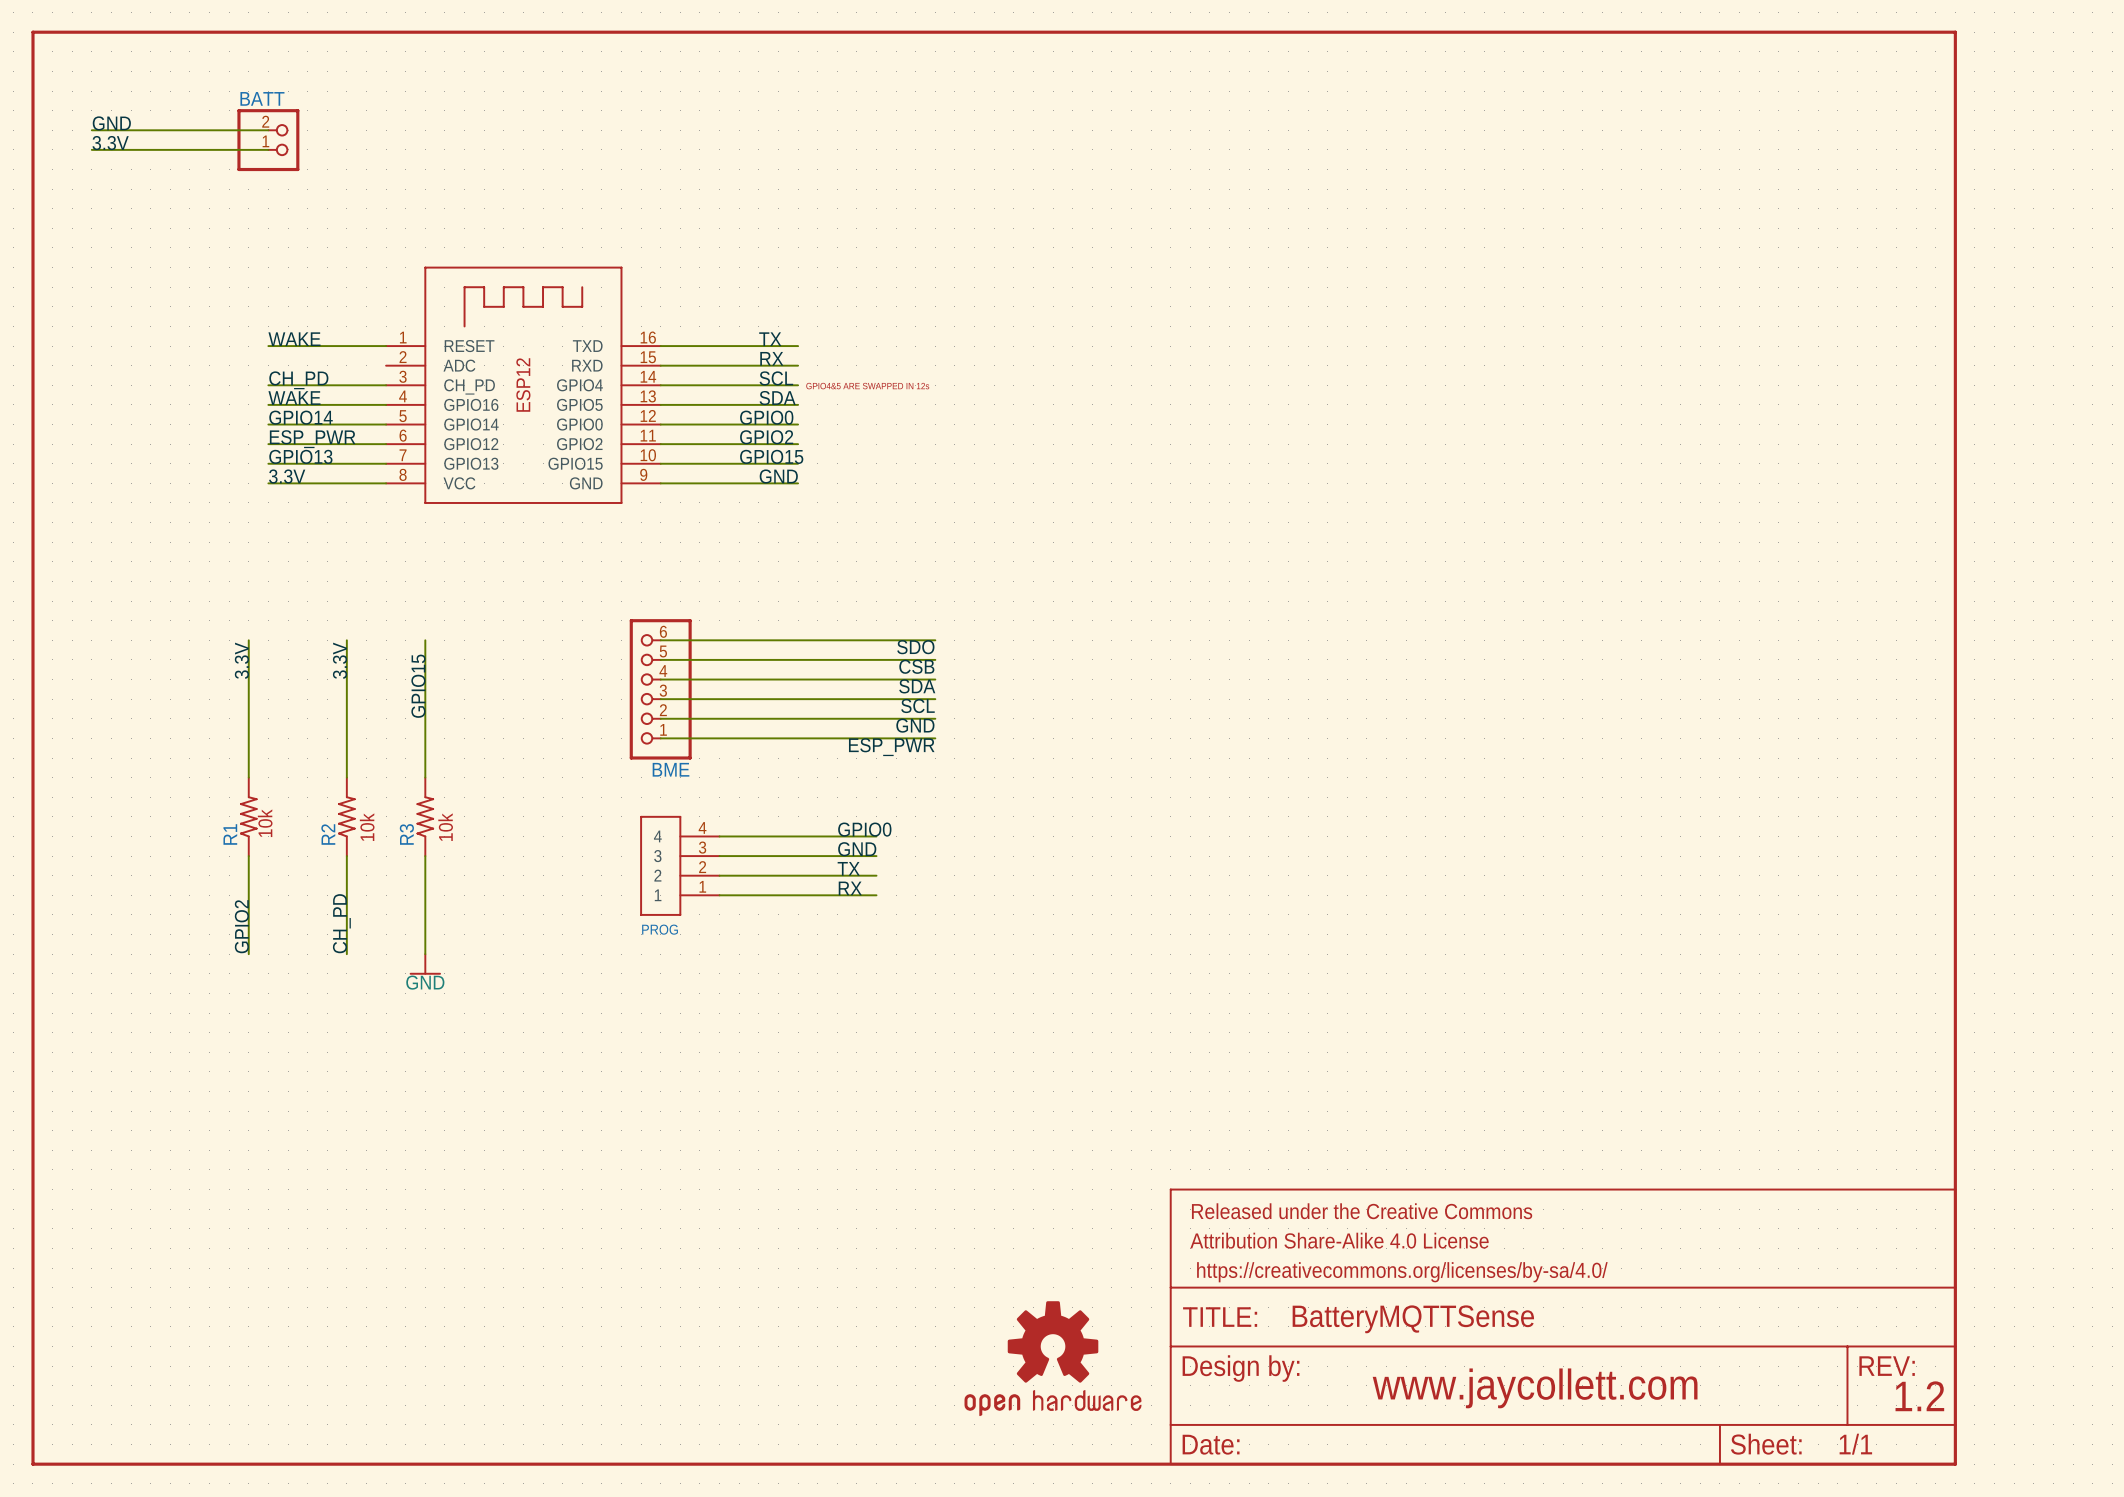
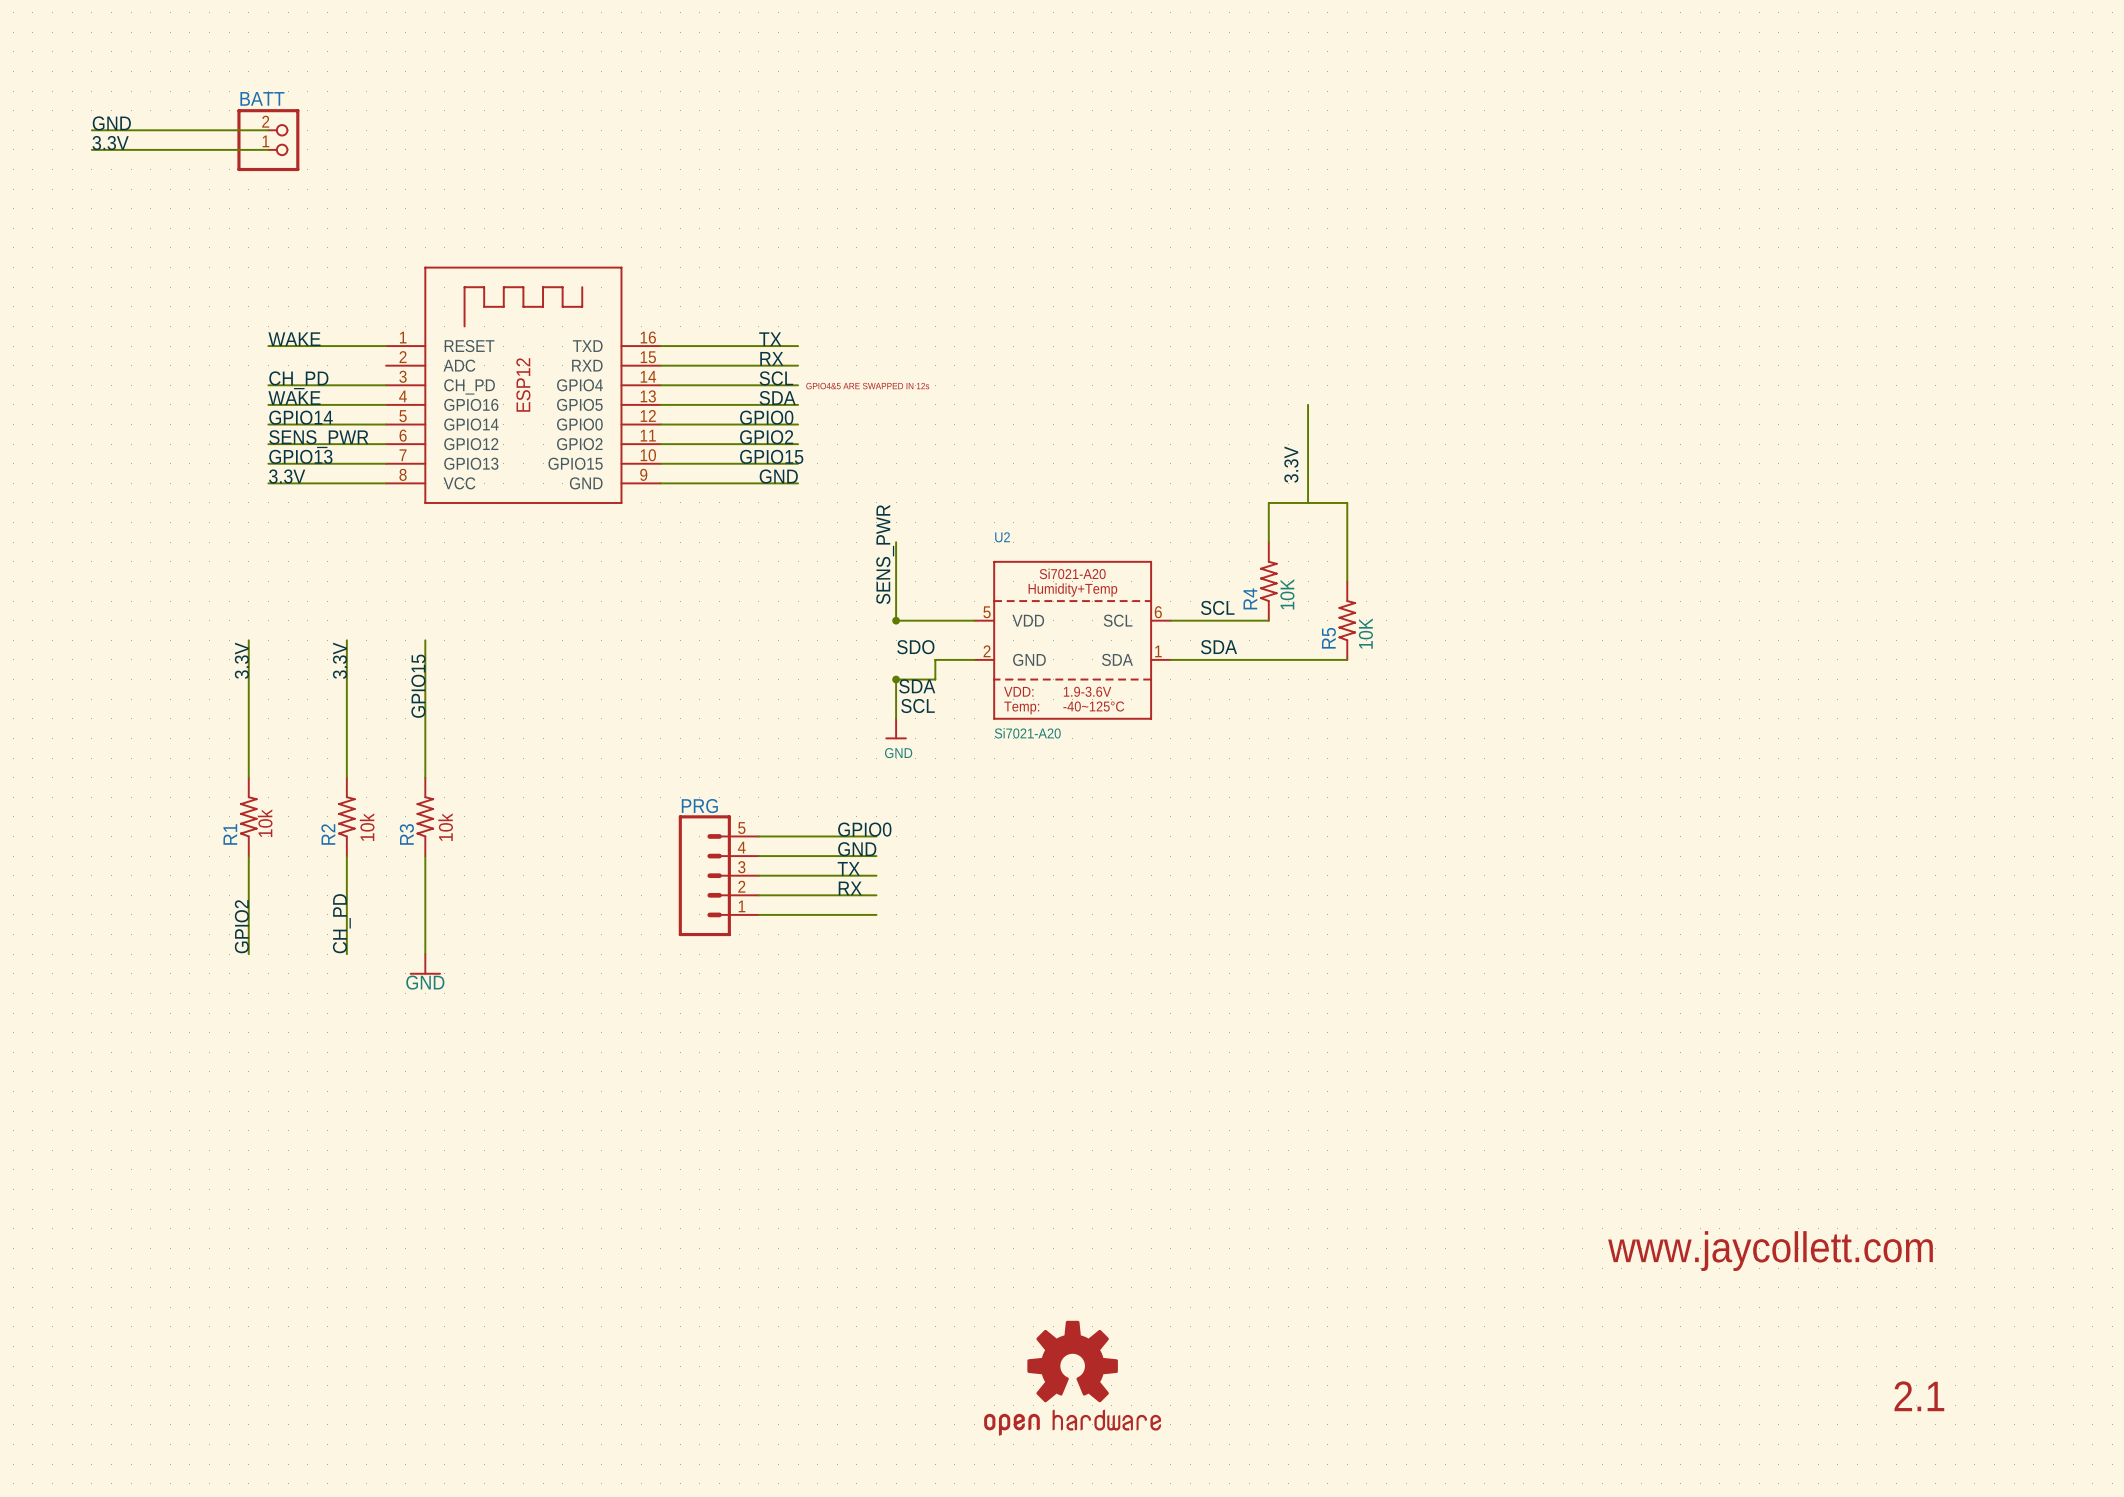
wire: none -> (1308, 404) (1308, 502)
label: ESP_PWR (312, 439) -> SENS_PWR (318, 439)
label: none -> 3.3V (1291, 464)
wire: none -> (896, 542) (896, 620) (974, 620)
wire: none -> (1268, 542) (1268, 502) (1347, 502) (1347, 581)
label: none -> SENS_PWR (885, 554)
R4: none -> 10K (1268, 581)
label: none -> SCL (1217, 607)
junction: none -> (896, 620)
wire: none -> (1170, 620) (1268, 620)
R5: none -> 10K (1347, 620)
wire: (660, 640) (935, 640) -> none
U2: none -> Si7021-A20 (1072, 640)
label: none -> SDA (1219, 647)
wire: (660, 659) (935, 659) -> none
wire: none -> (974, 659) (935, 659) (935, 679)
wire: none -> (1170, 659) (1347, 659)
label: CSB (916, 666) -> none
wire: (660, 679) (896, 679) -> (896, 718) (896, 679)
junction: none -> (896, 679)
BME: (660, 689) -> none
wire: (660, 699) (935, 699) -> none
wire: (660, 718) (935, 718) -> none
label: GND (915, 725) -> none
power symbol: none -> GND (896, 729)
wire: (660, 738) (935, 738) -> none
label: ESP_PWR (891, 747) -> none
part: (994, 748) -> none
PROG: (679, 865) -> none
PRG: none -> (718, 875)
wire: none -> (758, 914) (876, 914)
text: none -> www.jaycollett.com (1770, 1251)
part: (1563, 1326) -> none
part position: (1052, 1358) -> (1072, 1378)
text: www.jaycollett.com (1535, 1388) -> none
text: 1.2 (1919, 1396) -> 2.1 (1919, 1396)

